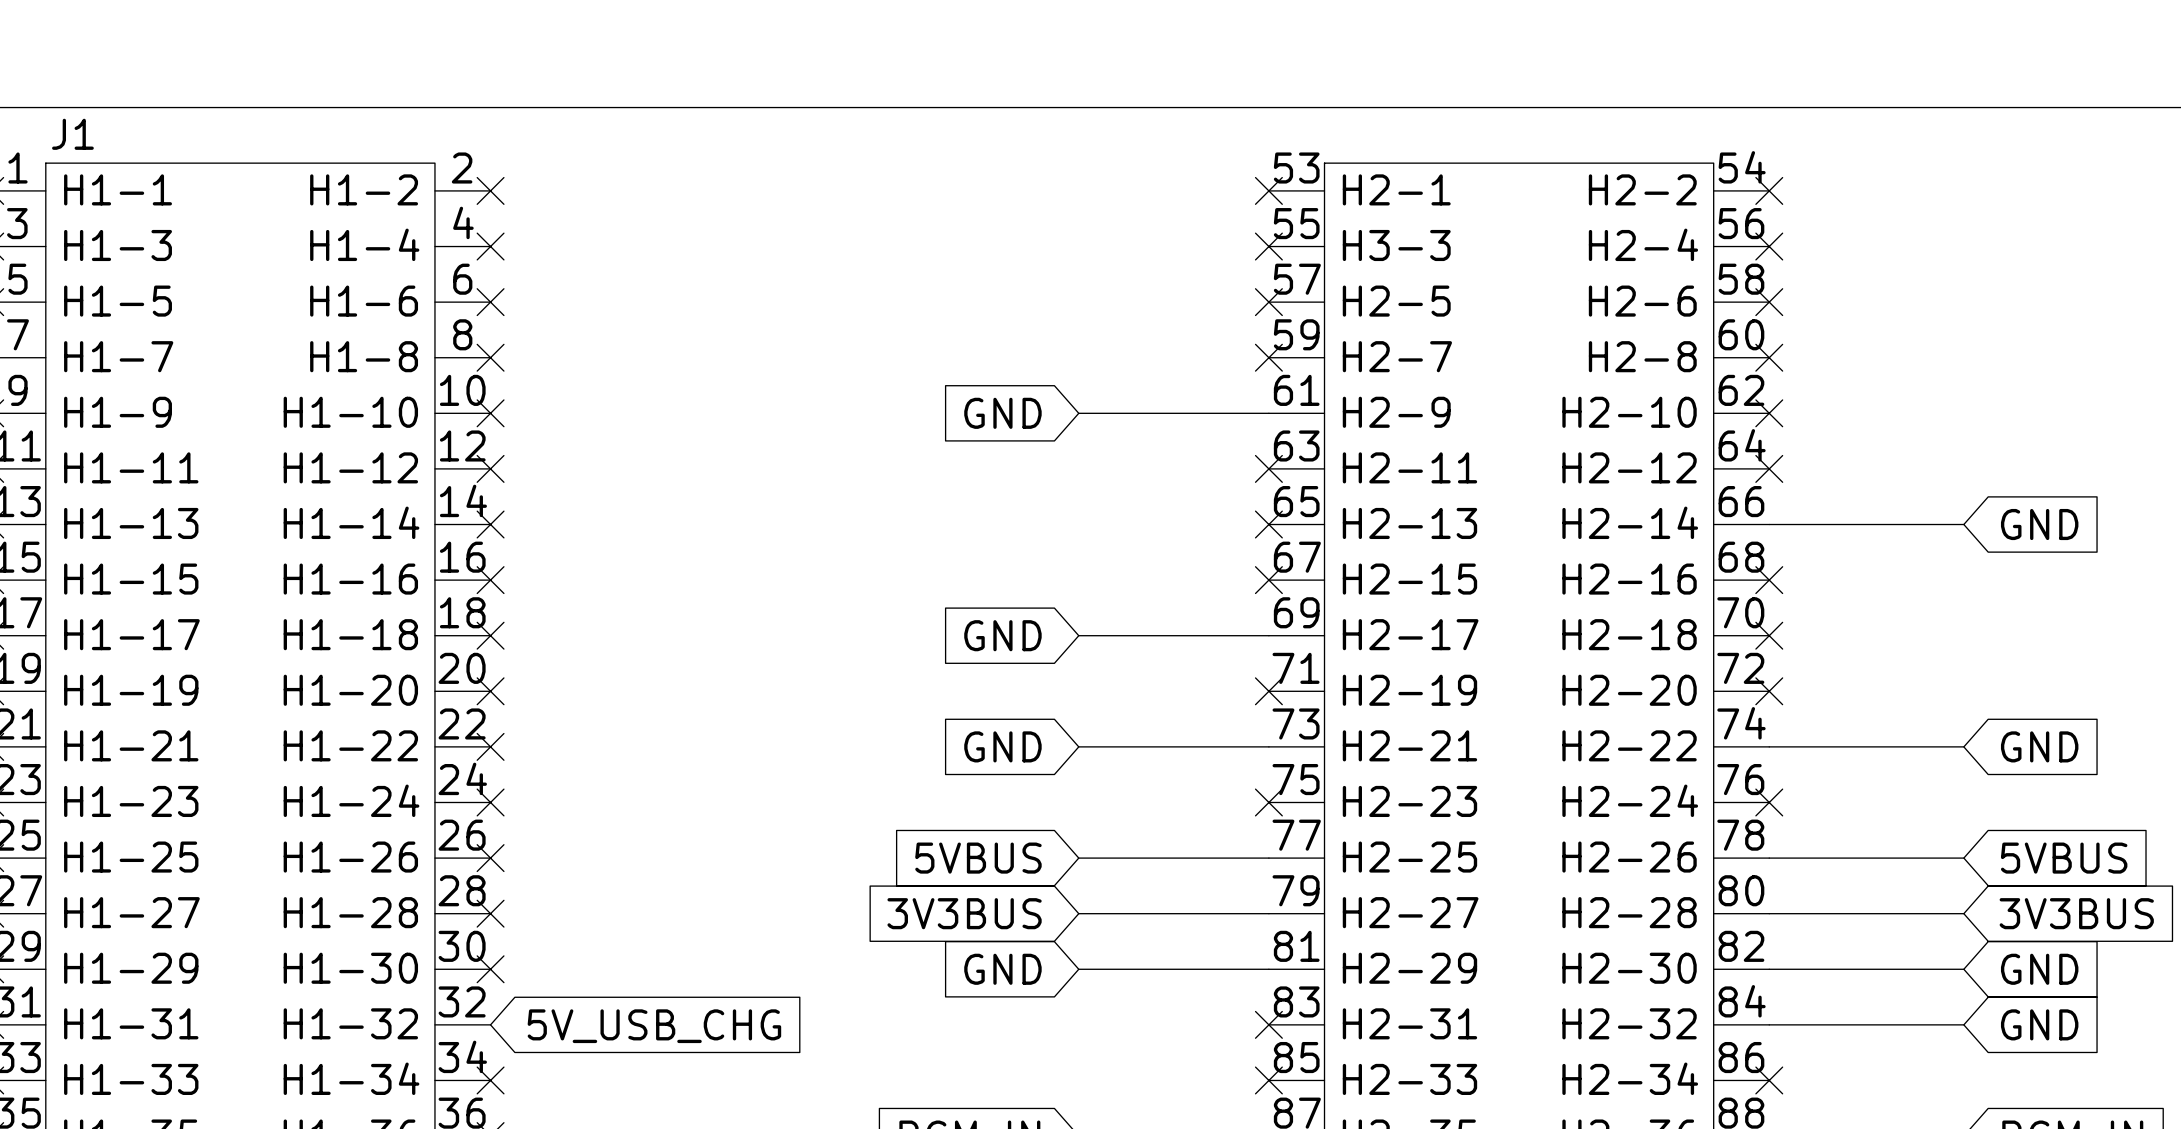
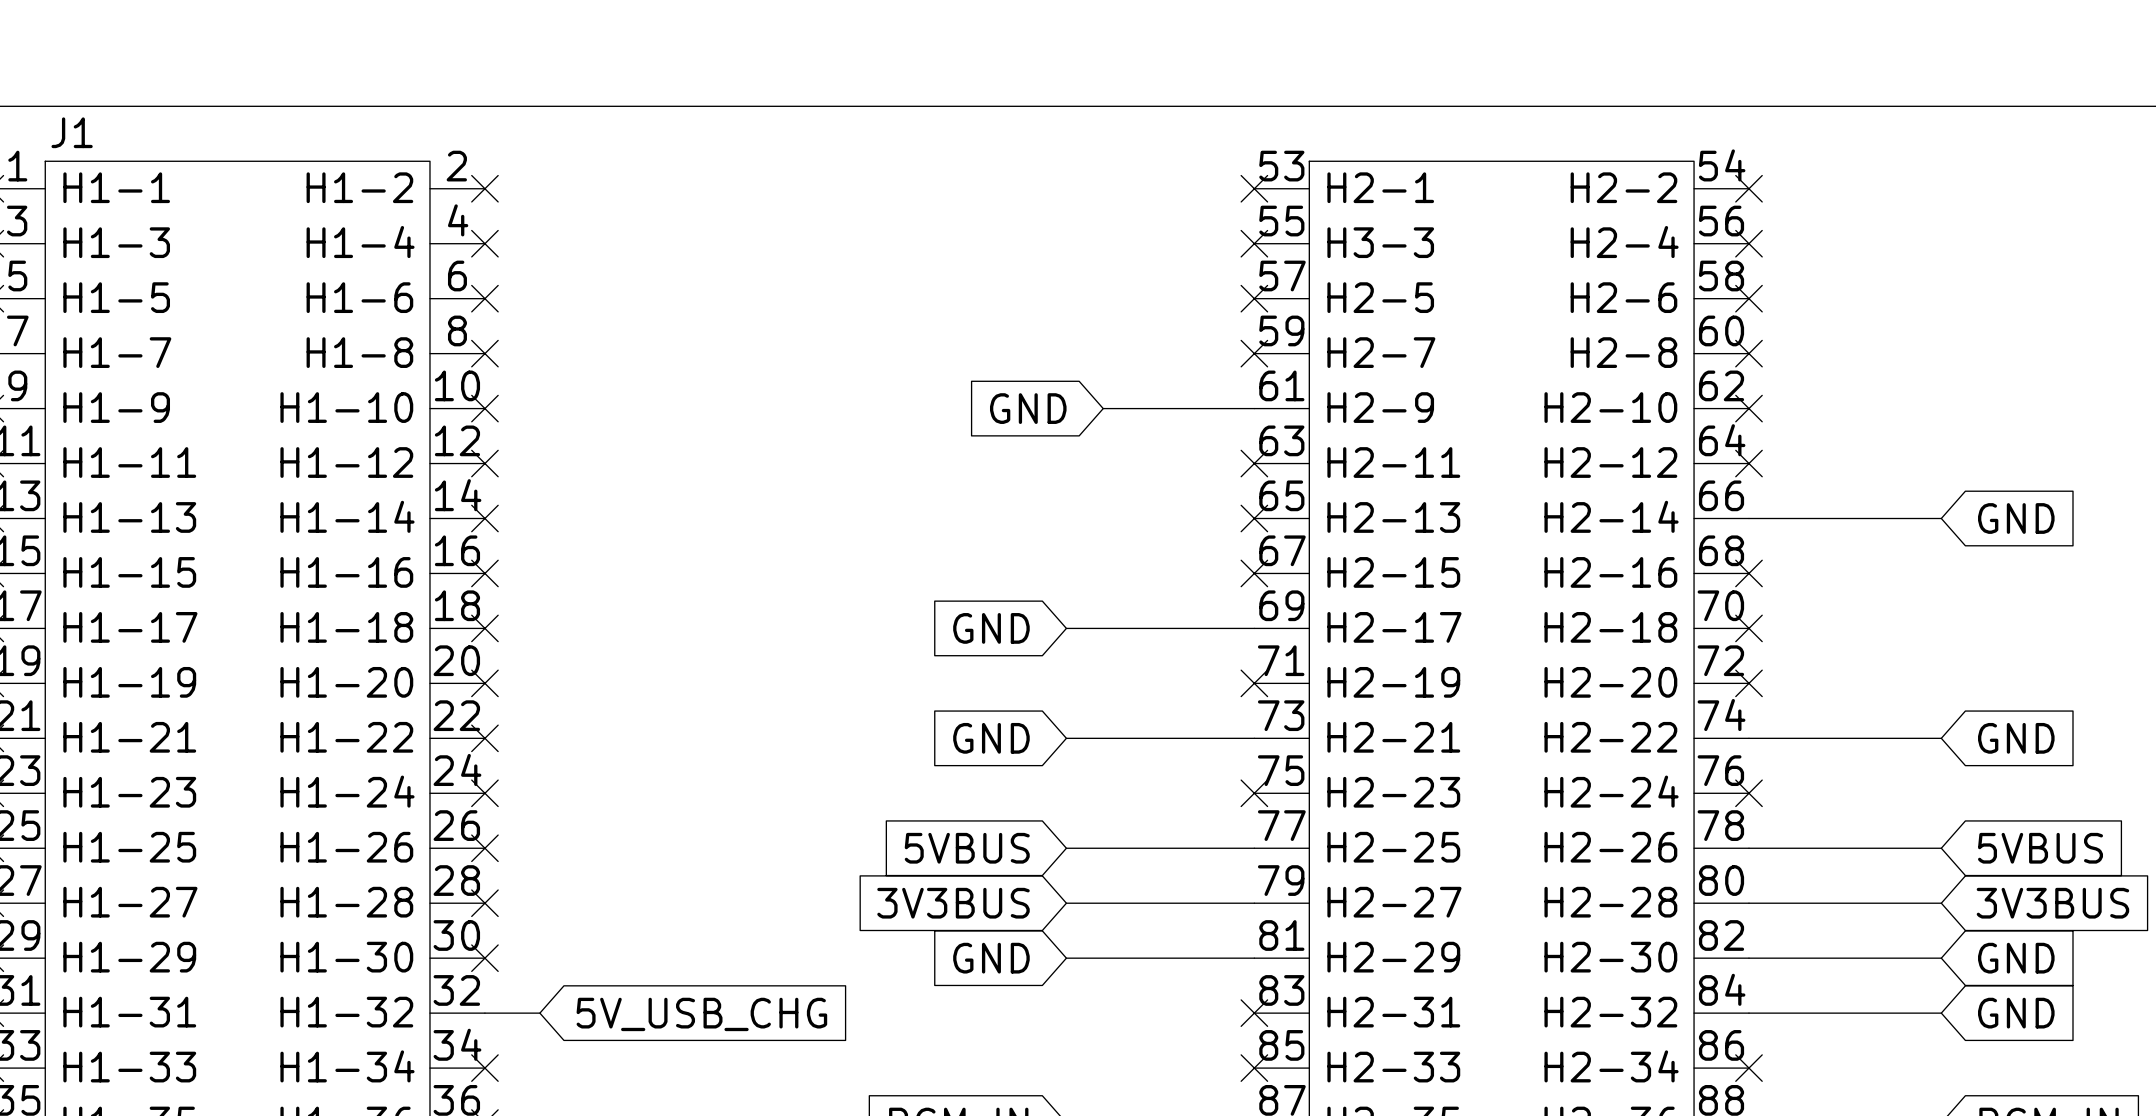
global label position: GND (1002, 413) -> GND (1028, 408)
wire: (1078, 413) (1116, 413) -> none
wire: none -> (484, 1013) (539, 1013)
global label position: 5V_USB_CHG (654, 1026) -> 5V_USB_CHG (701, 1014)

